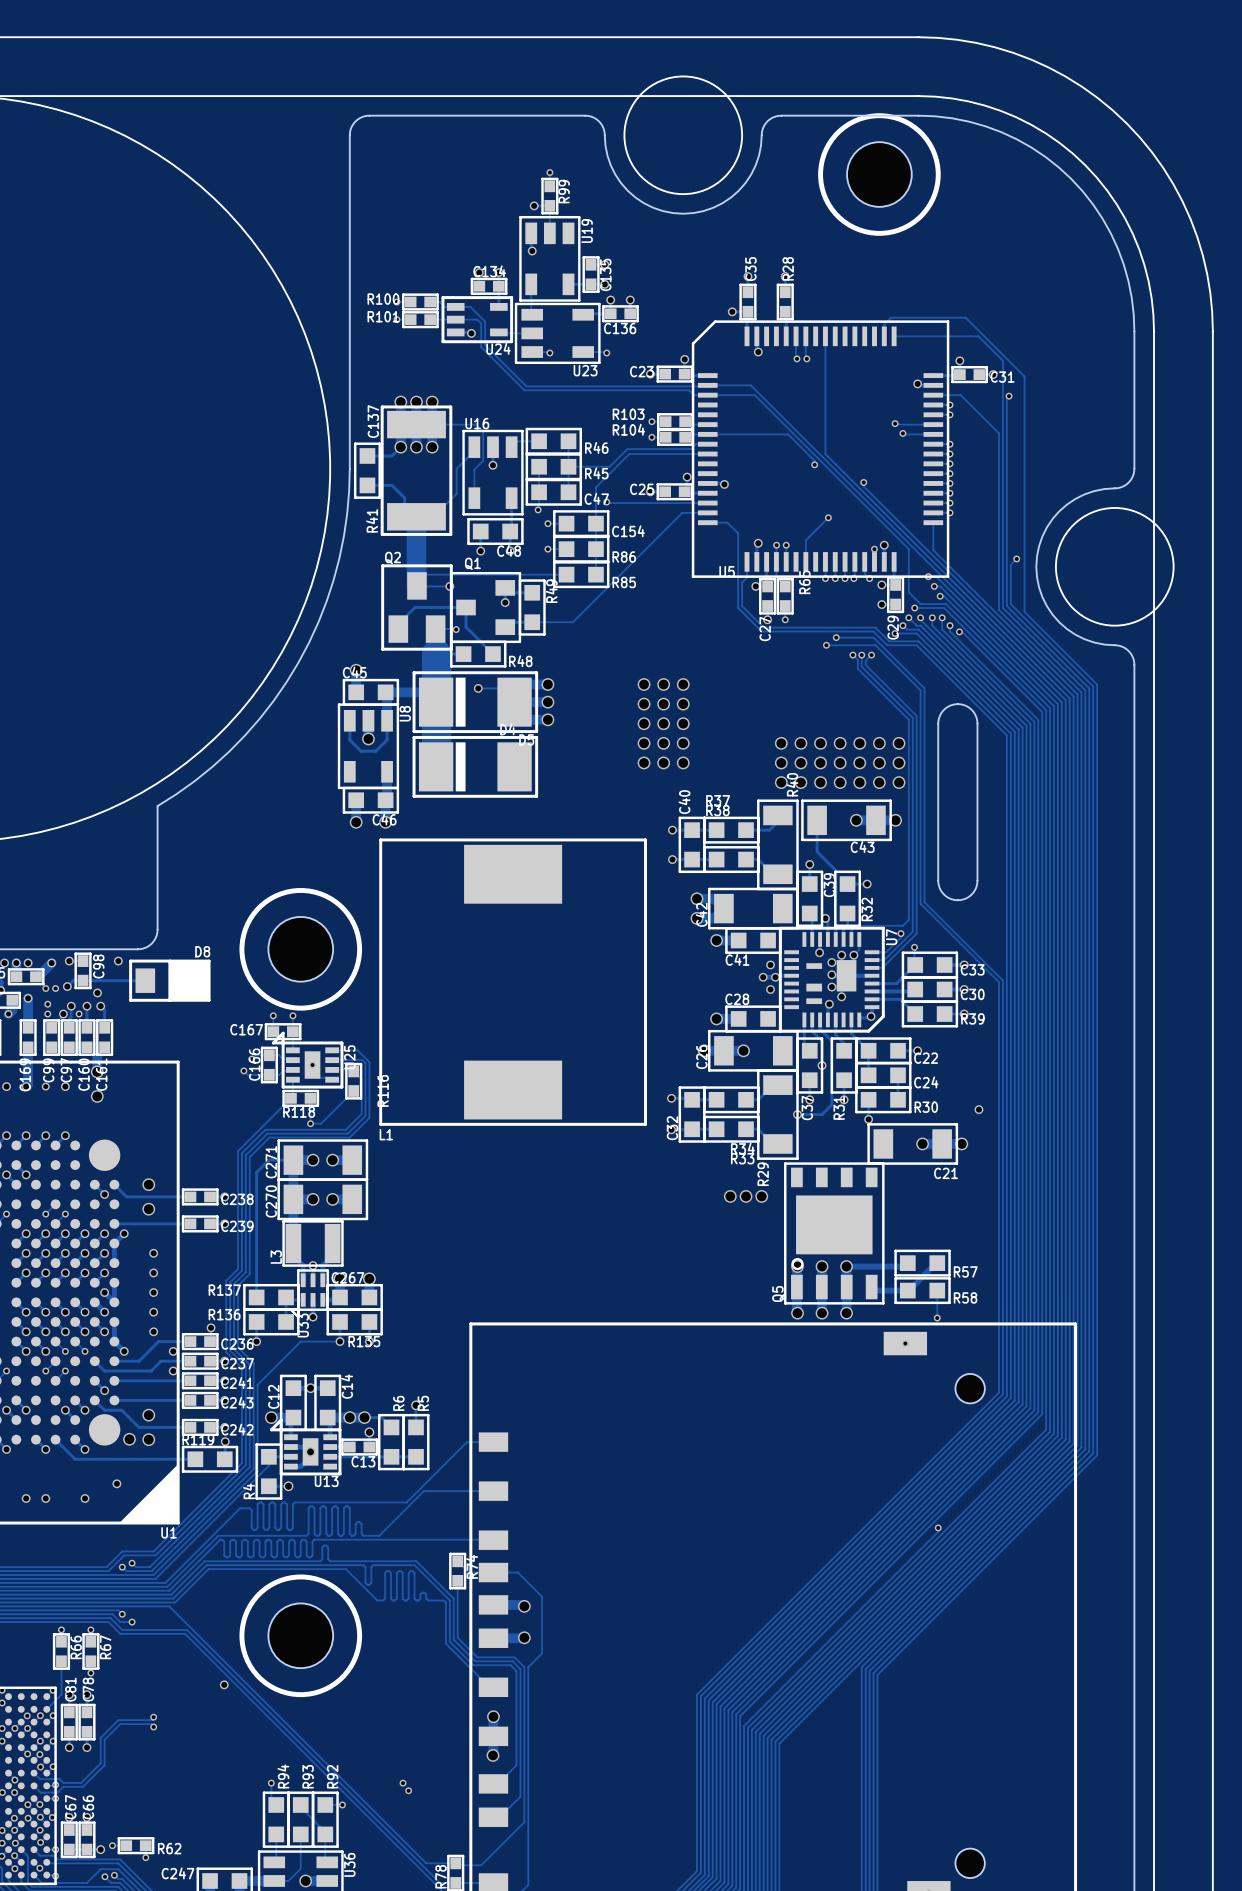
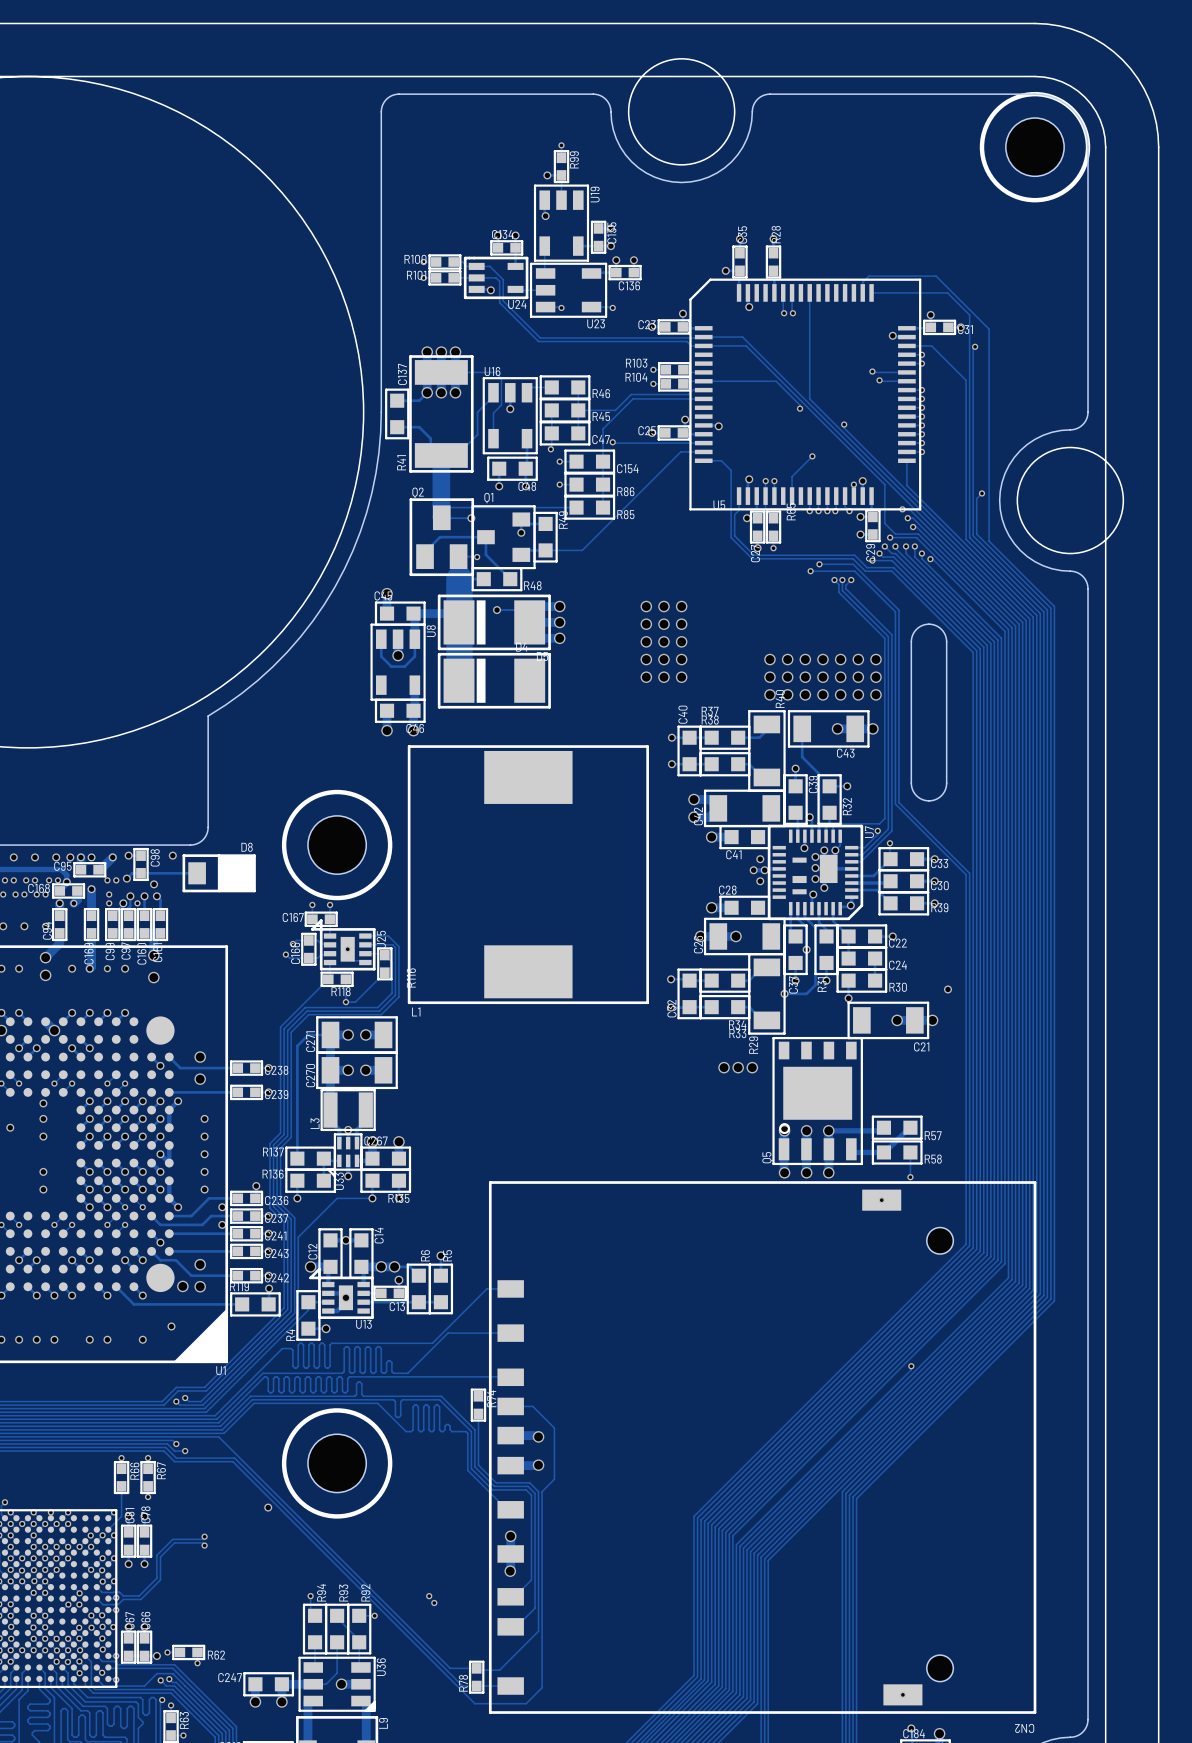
line: (918, 37) (976, 42) (1031, 59) (1082, 86) (1126, 123) (1163, 167) (1190, 218) (1207, 274) (1212, 331) -> (893, 23) (1035, 23) (1059, 25) (1093, 38) (1122, 59) (1144, 88) (1156, 123) (1158, 147) (1158, 288)
line: (918, 96) (968, 101) (1016, 117) (1059, 143) (1085, 165) (1107, 190) (1132, 233) (1148, 281) (1154, 331) -> (893, 76) (1044, 77) (1070, 85) (1084, 97) (1096, 111) (1105, 137) (1105, 288)
board edge: (918, 115) (952, 118) (1001, 132) (1045, 156) (1071, 178) (1093, 204) (1117, 248) (1131, 297) (1134, 331) -> (893, 94) (1041, 94) (1061, 101) (1072, 109) (1080, 120) (1087, 140) (1088, 288)
part position: (879, 174) -> (1035, 147)

